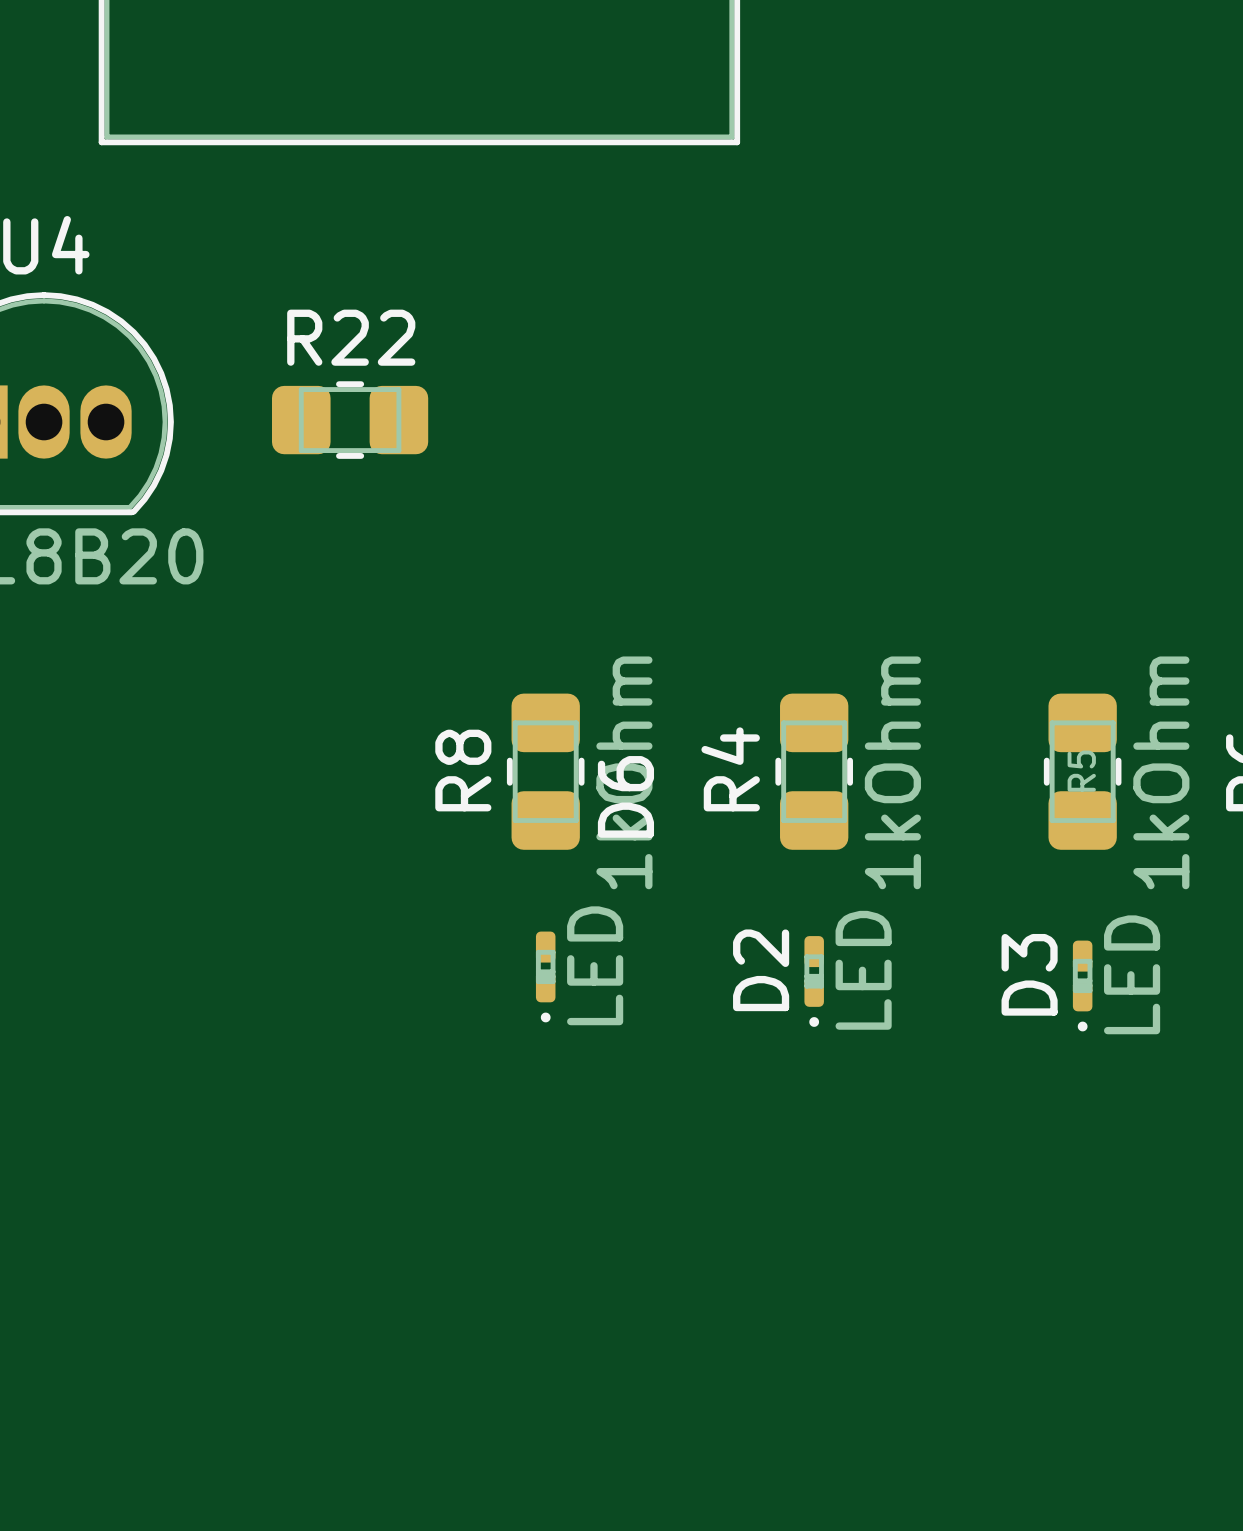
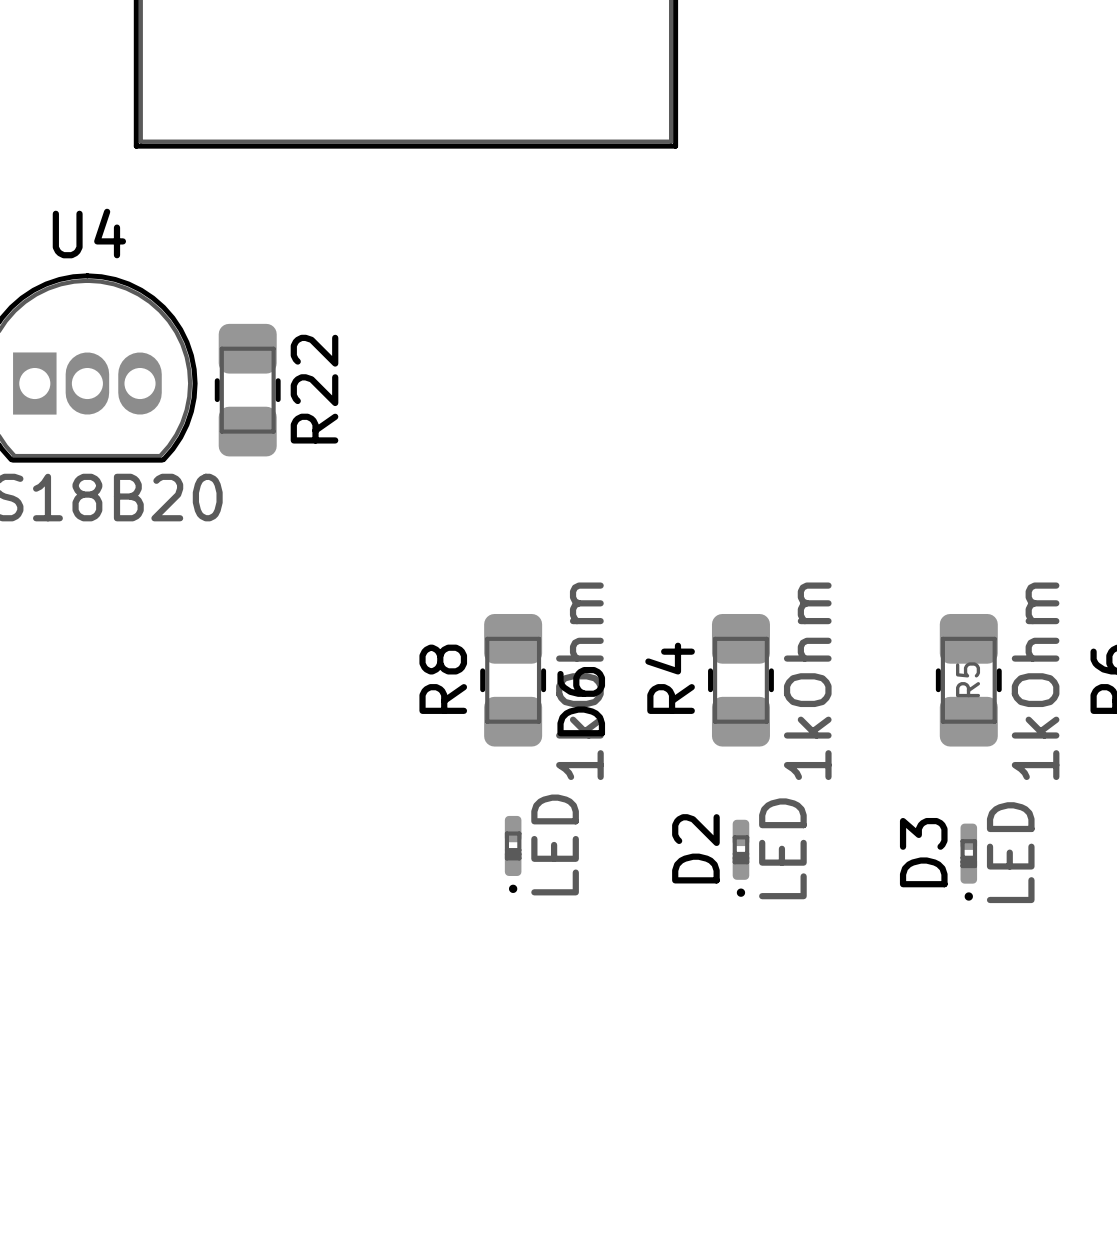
R22 rotation: 0° (350, 420) -> 90° clockwise (247, 390)
R22 position: (350, 420) -> (247, 390)

